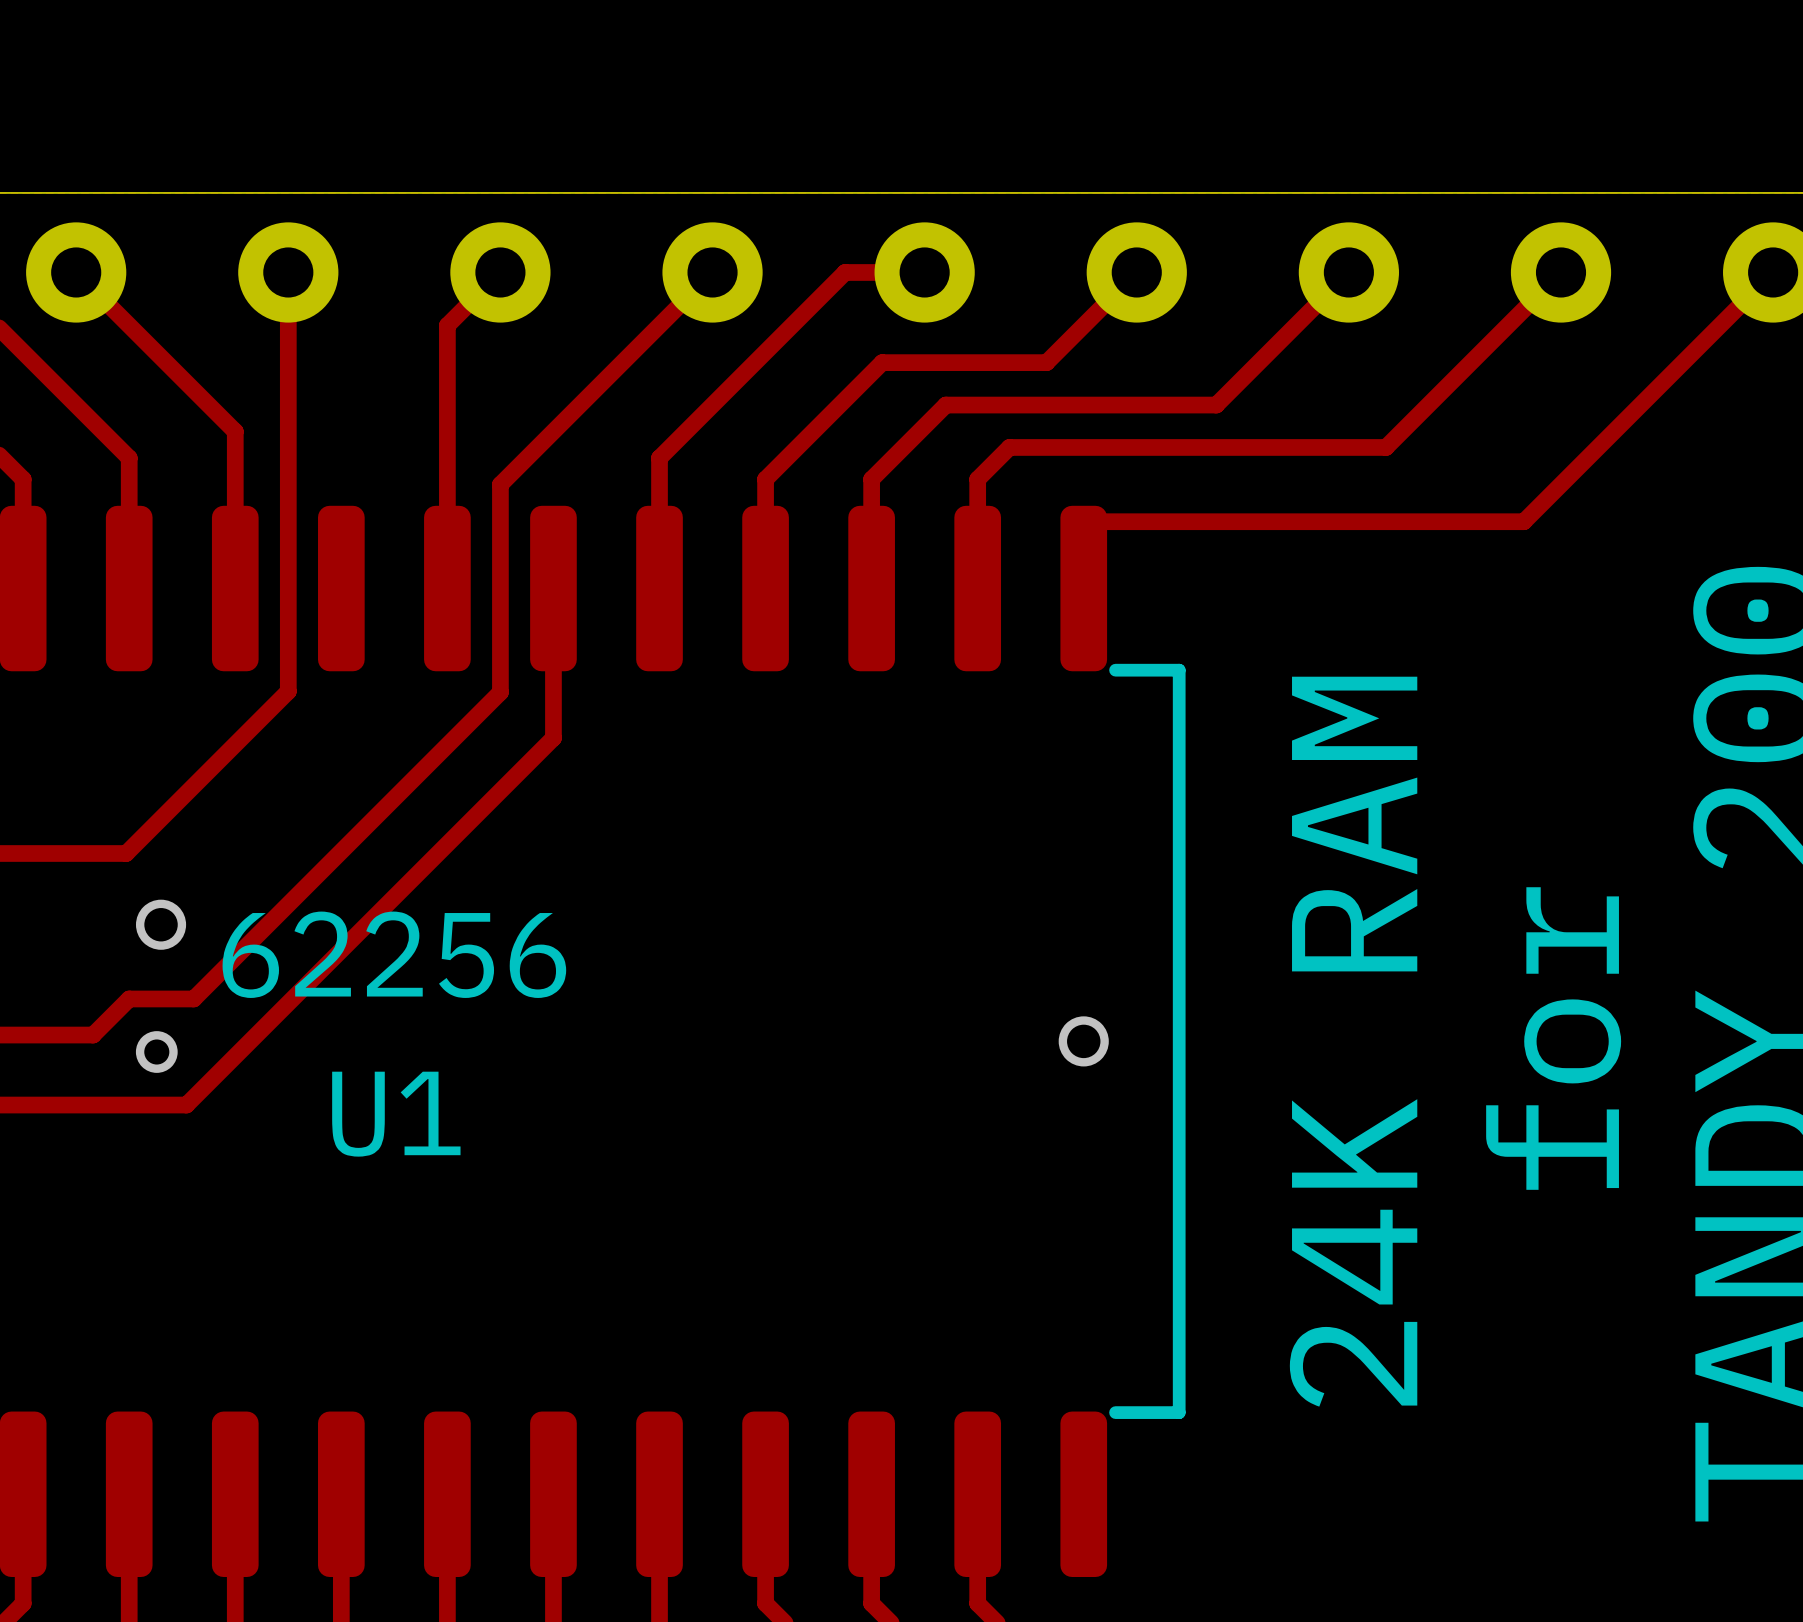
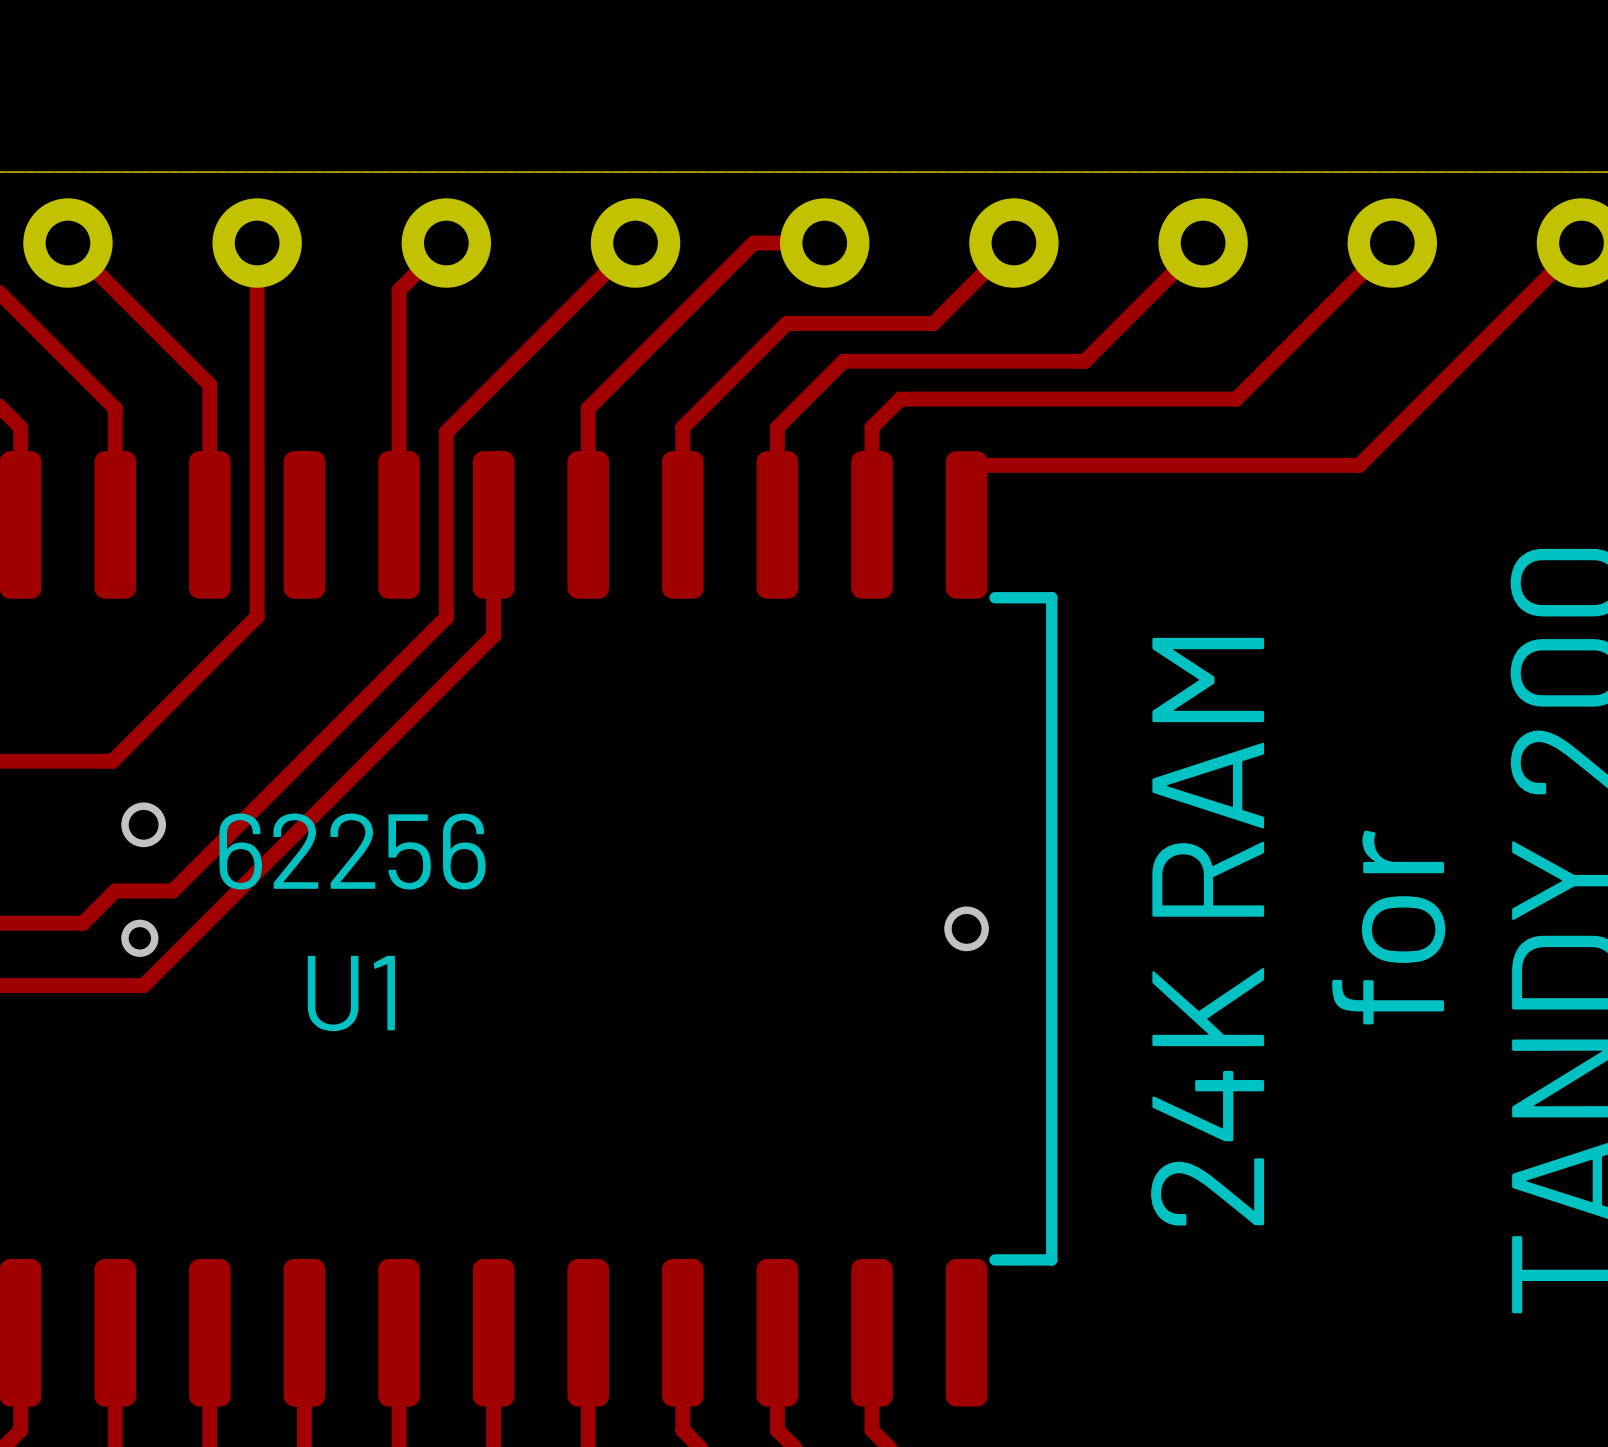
top track: (553, 712) (553, 738) (186, 1105) (161, 1105) -> (493, 635) (143, 985)

